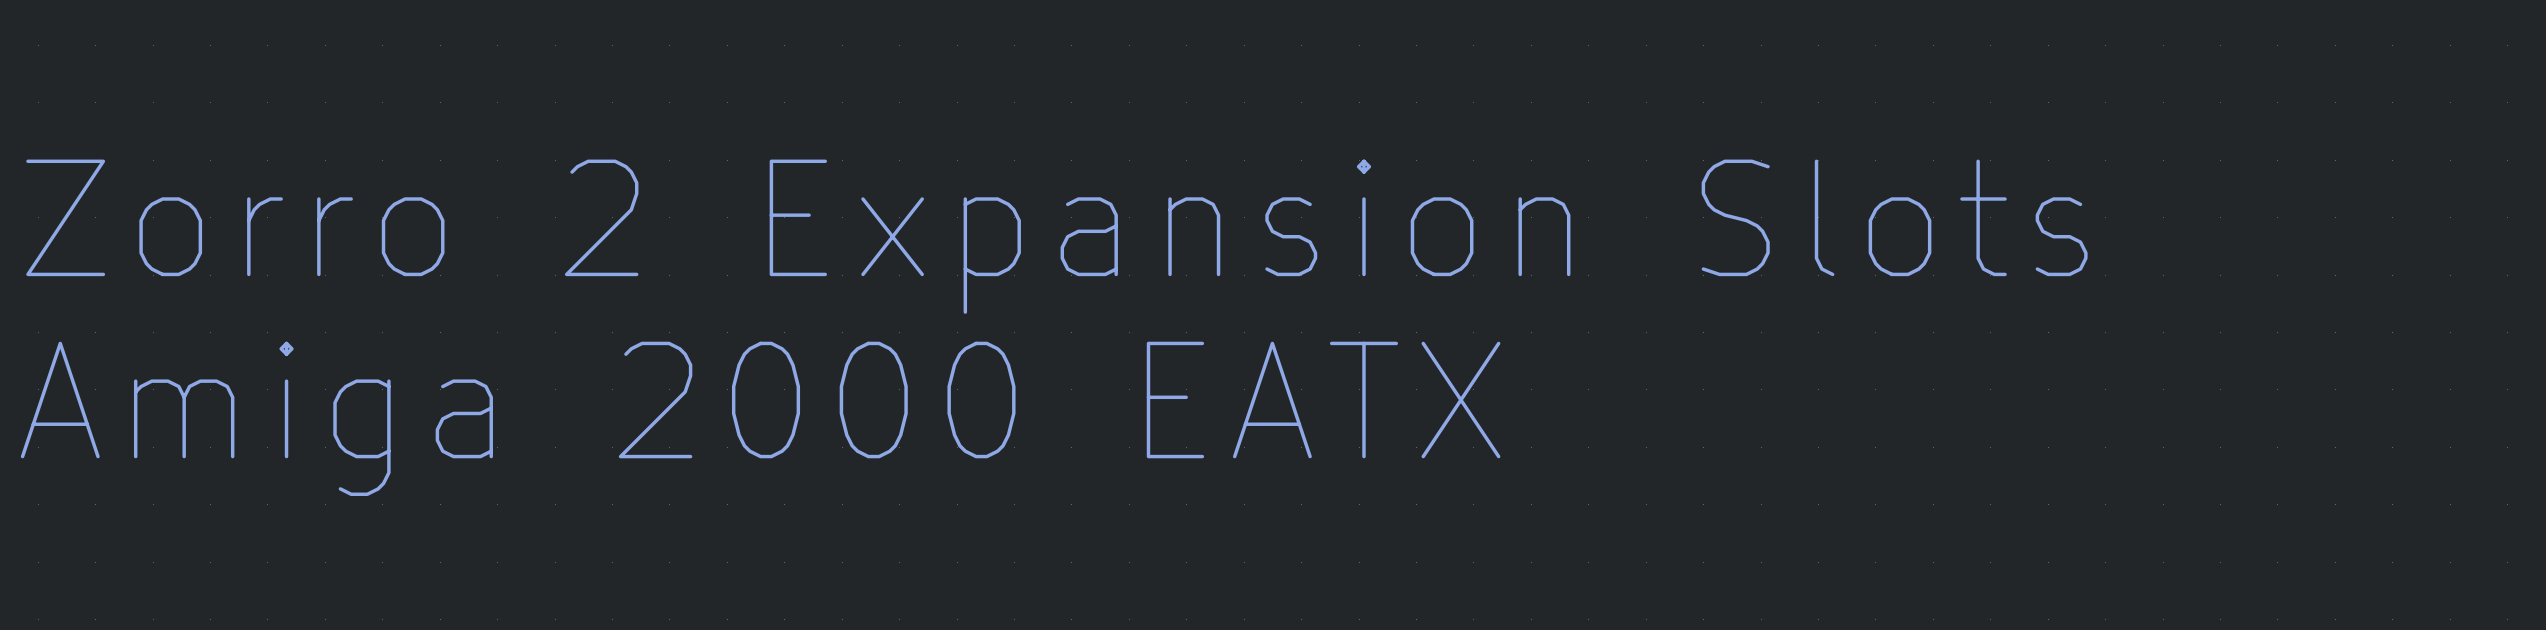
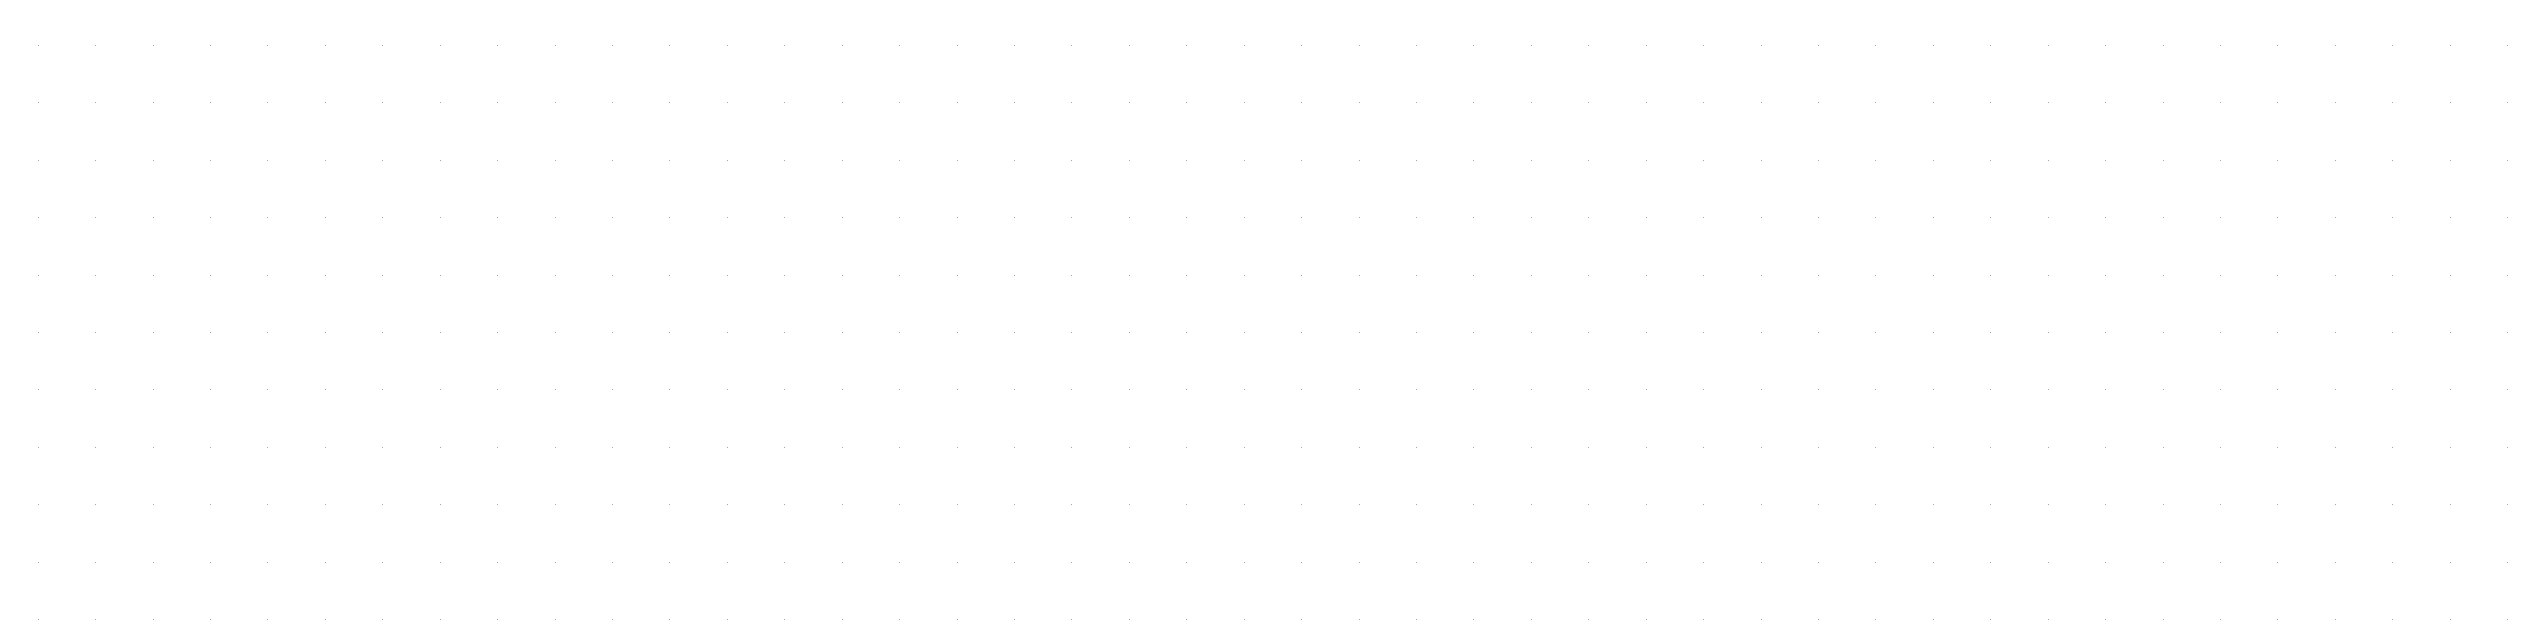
text: Zorro 2 Expansion Slots (1056, 236) -> none
text: Amiga 2000 EATX (760, 418) -> none

